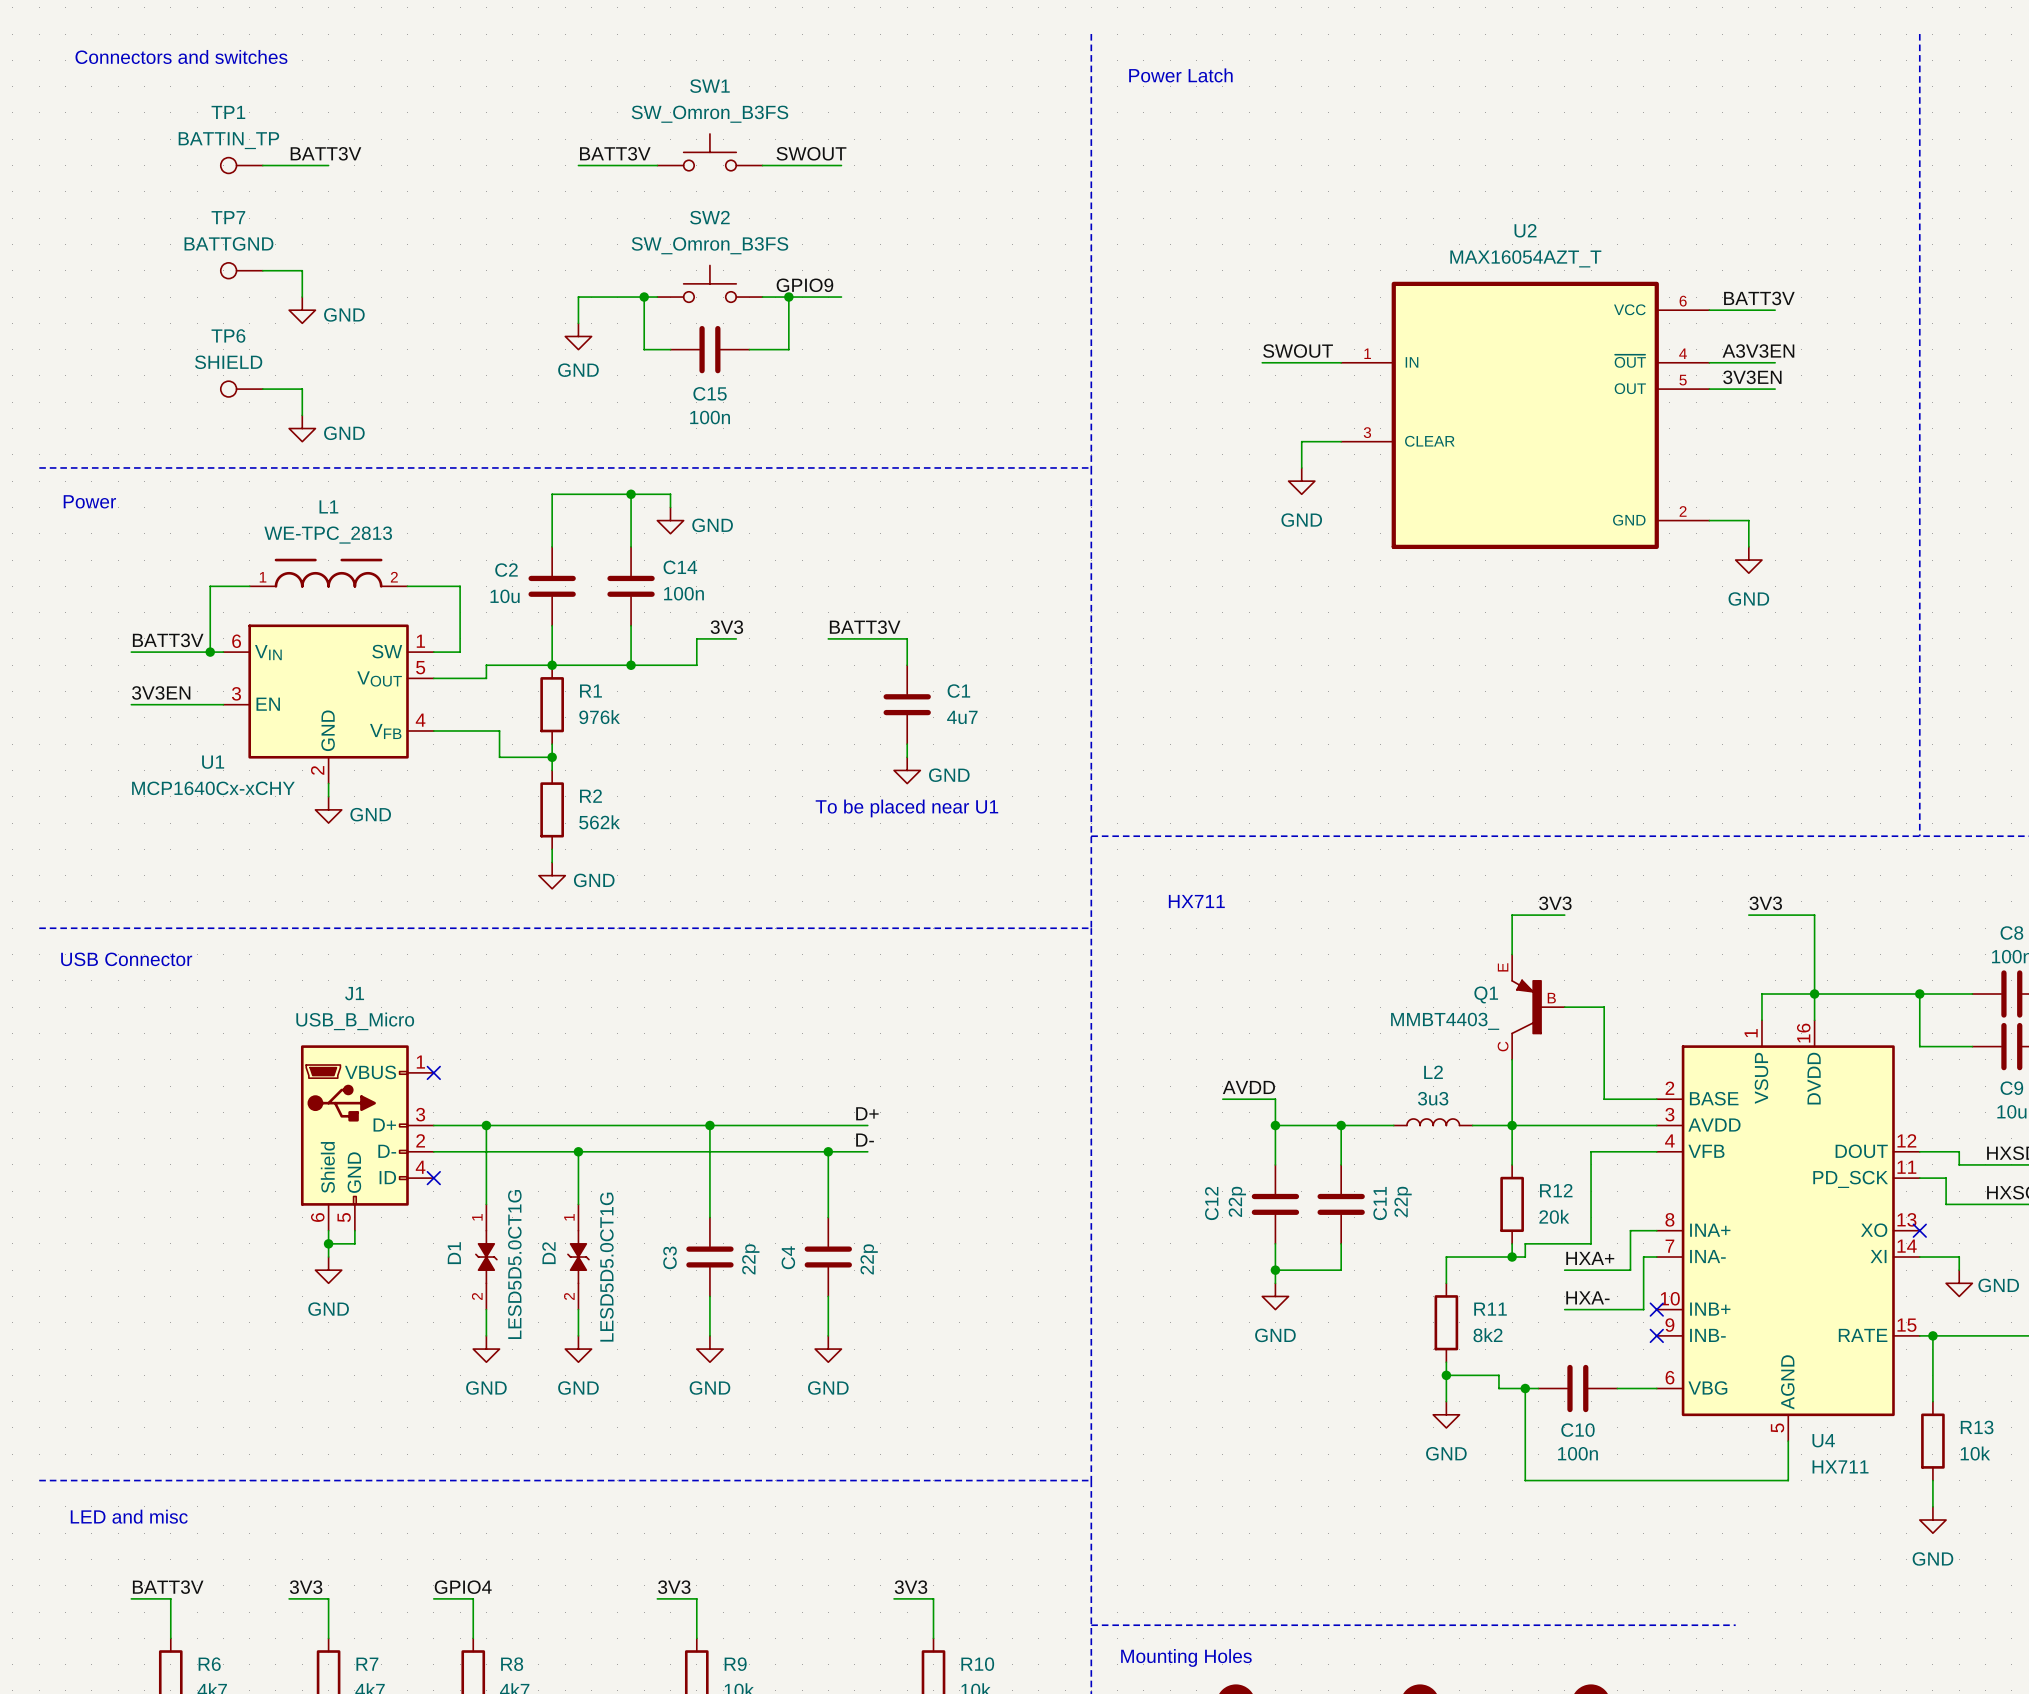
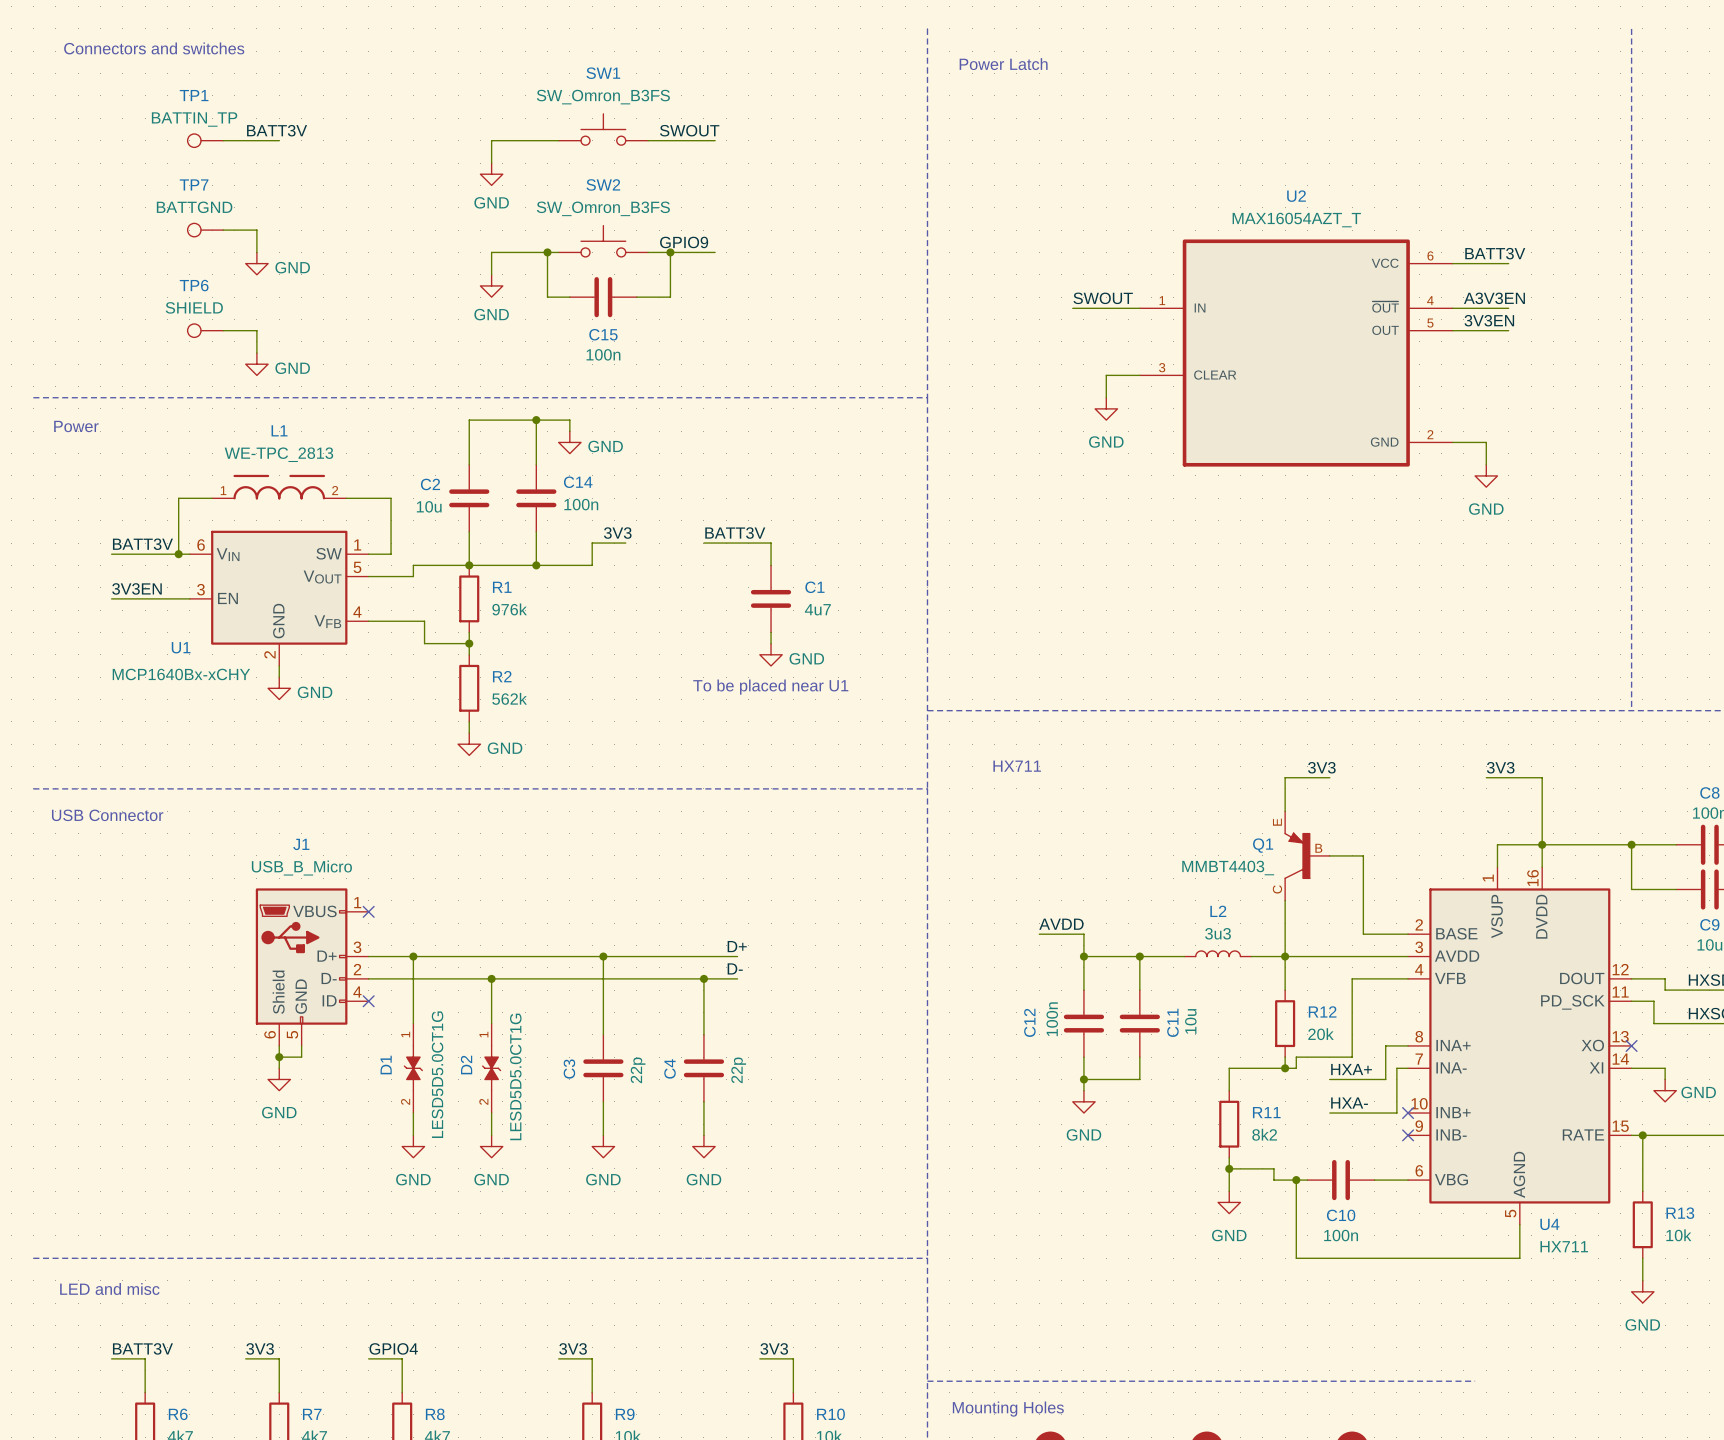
label: BATT3V (615, 153) -> none
wire: none -> (491, 140) (491, 163)
power symbol: none -> GND (491, 174)
U1 value: MCP1640Cx-xCHY (213, 788) -> MCP1640Bx-xCHY (181, 674)
C12 value: 22p (1237, 1201) -> 100n (1052, 1019)
C11 value: 22p (1403, 1201) -> 10u (1190, 1021)

